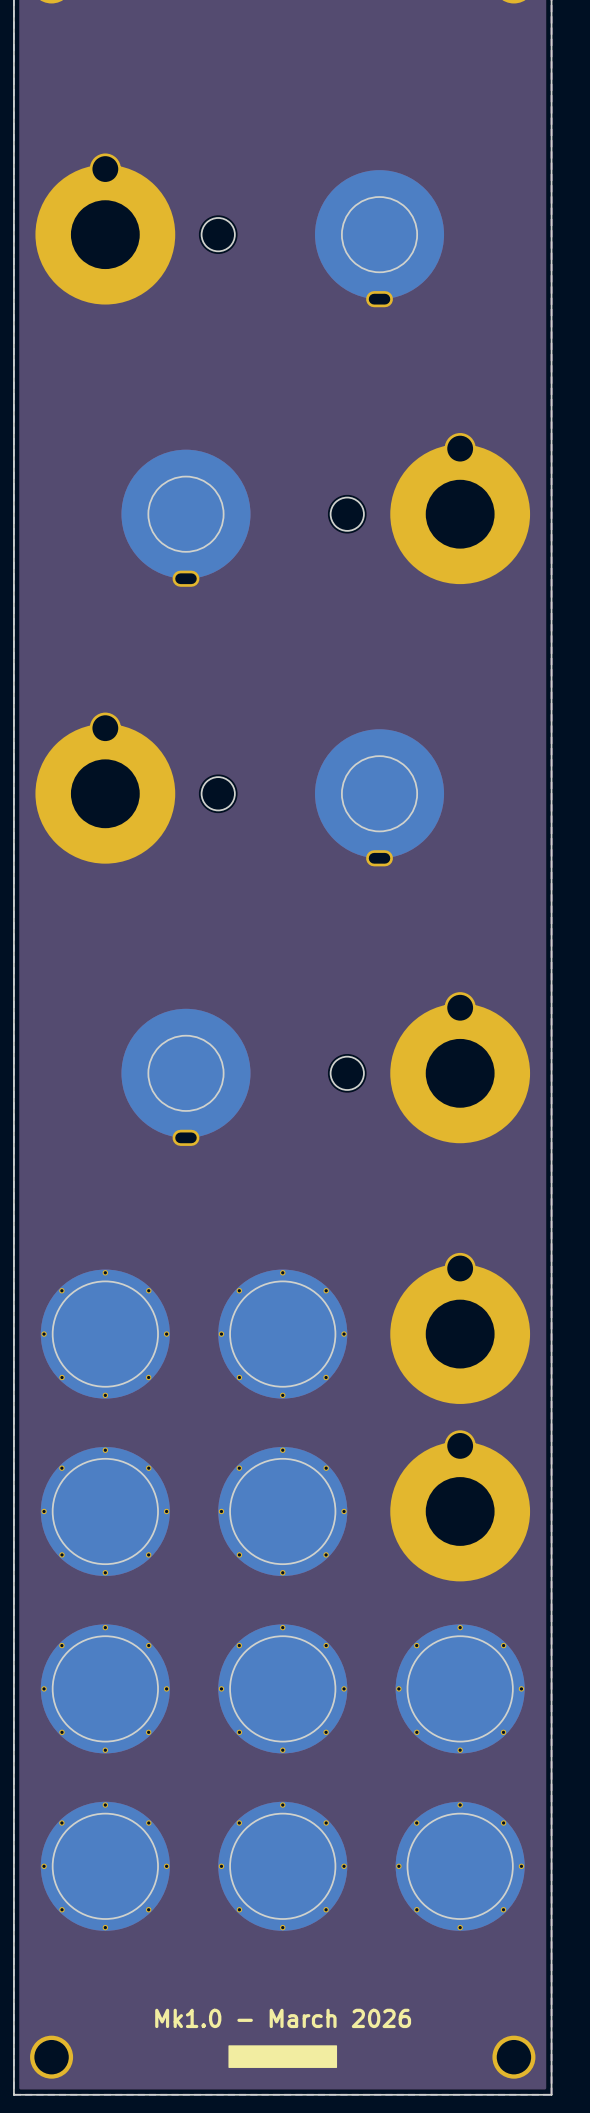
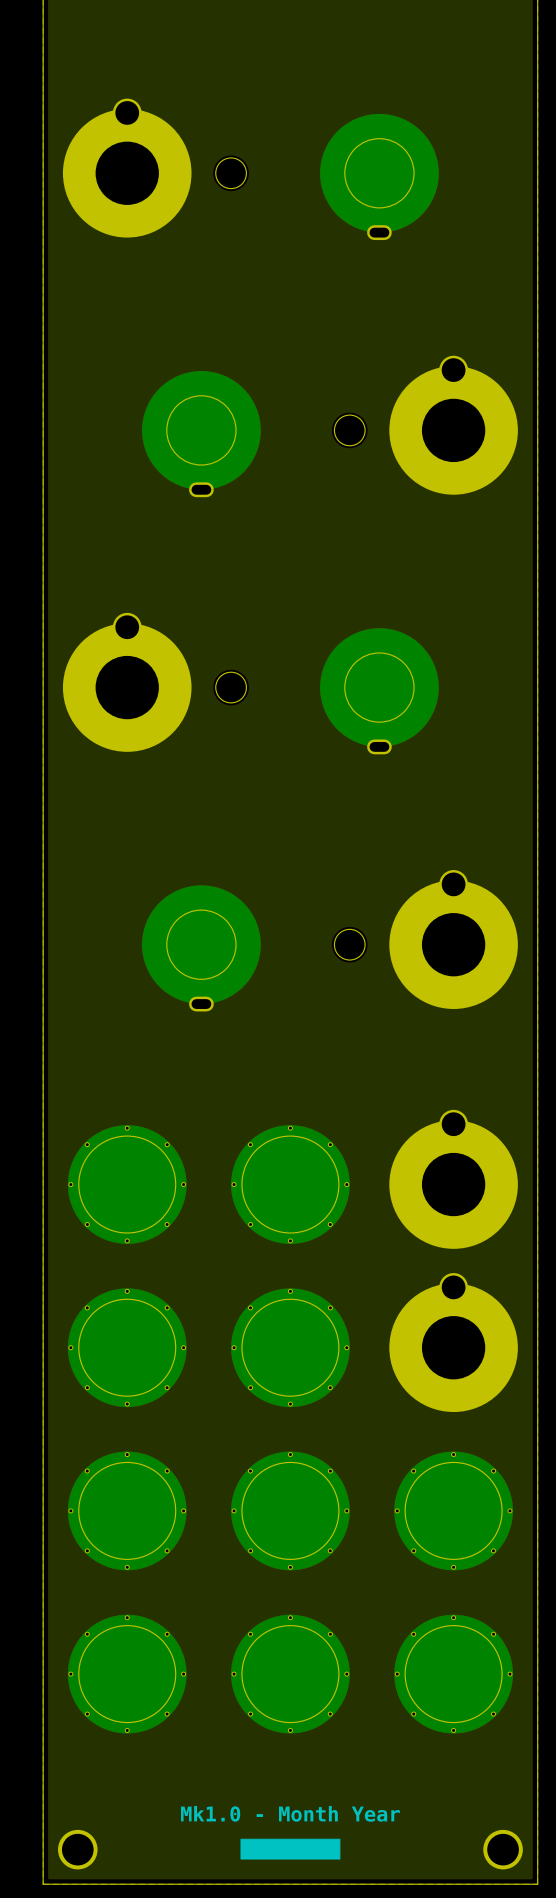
text: Mk1.0 - March 2026 (283, 2018) -> Mk1.0 - Month Year (290, 1813)

